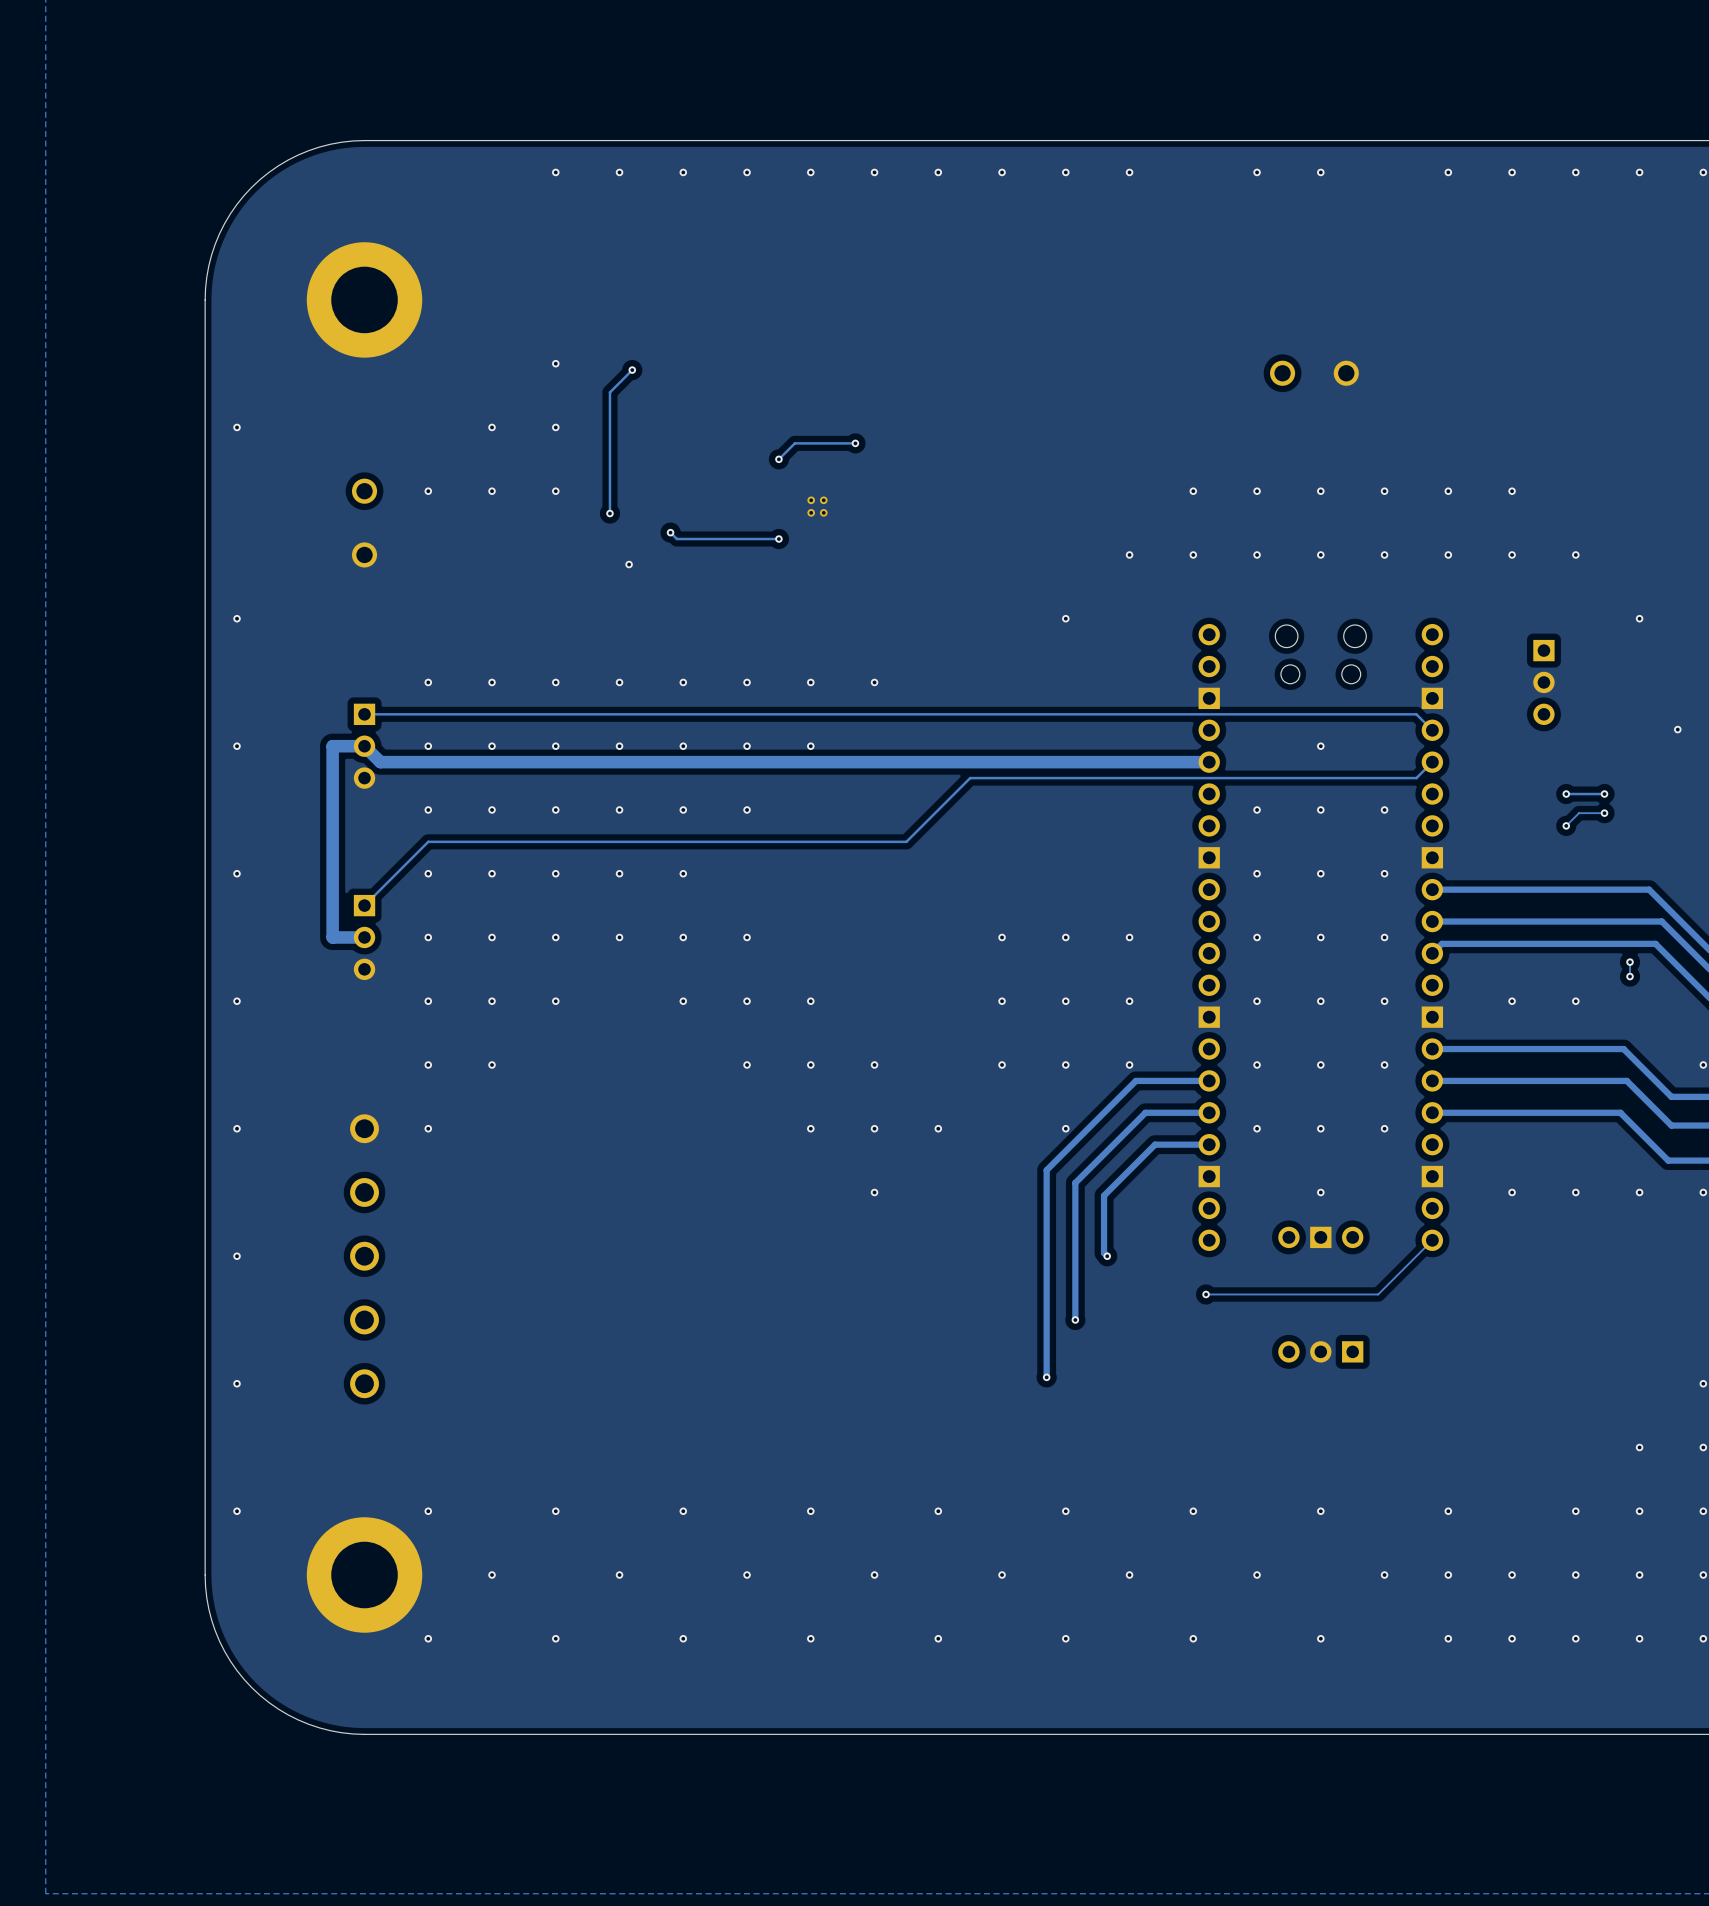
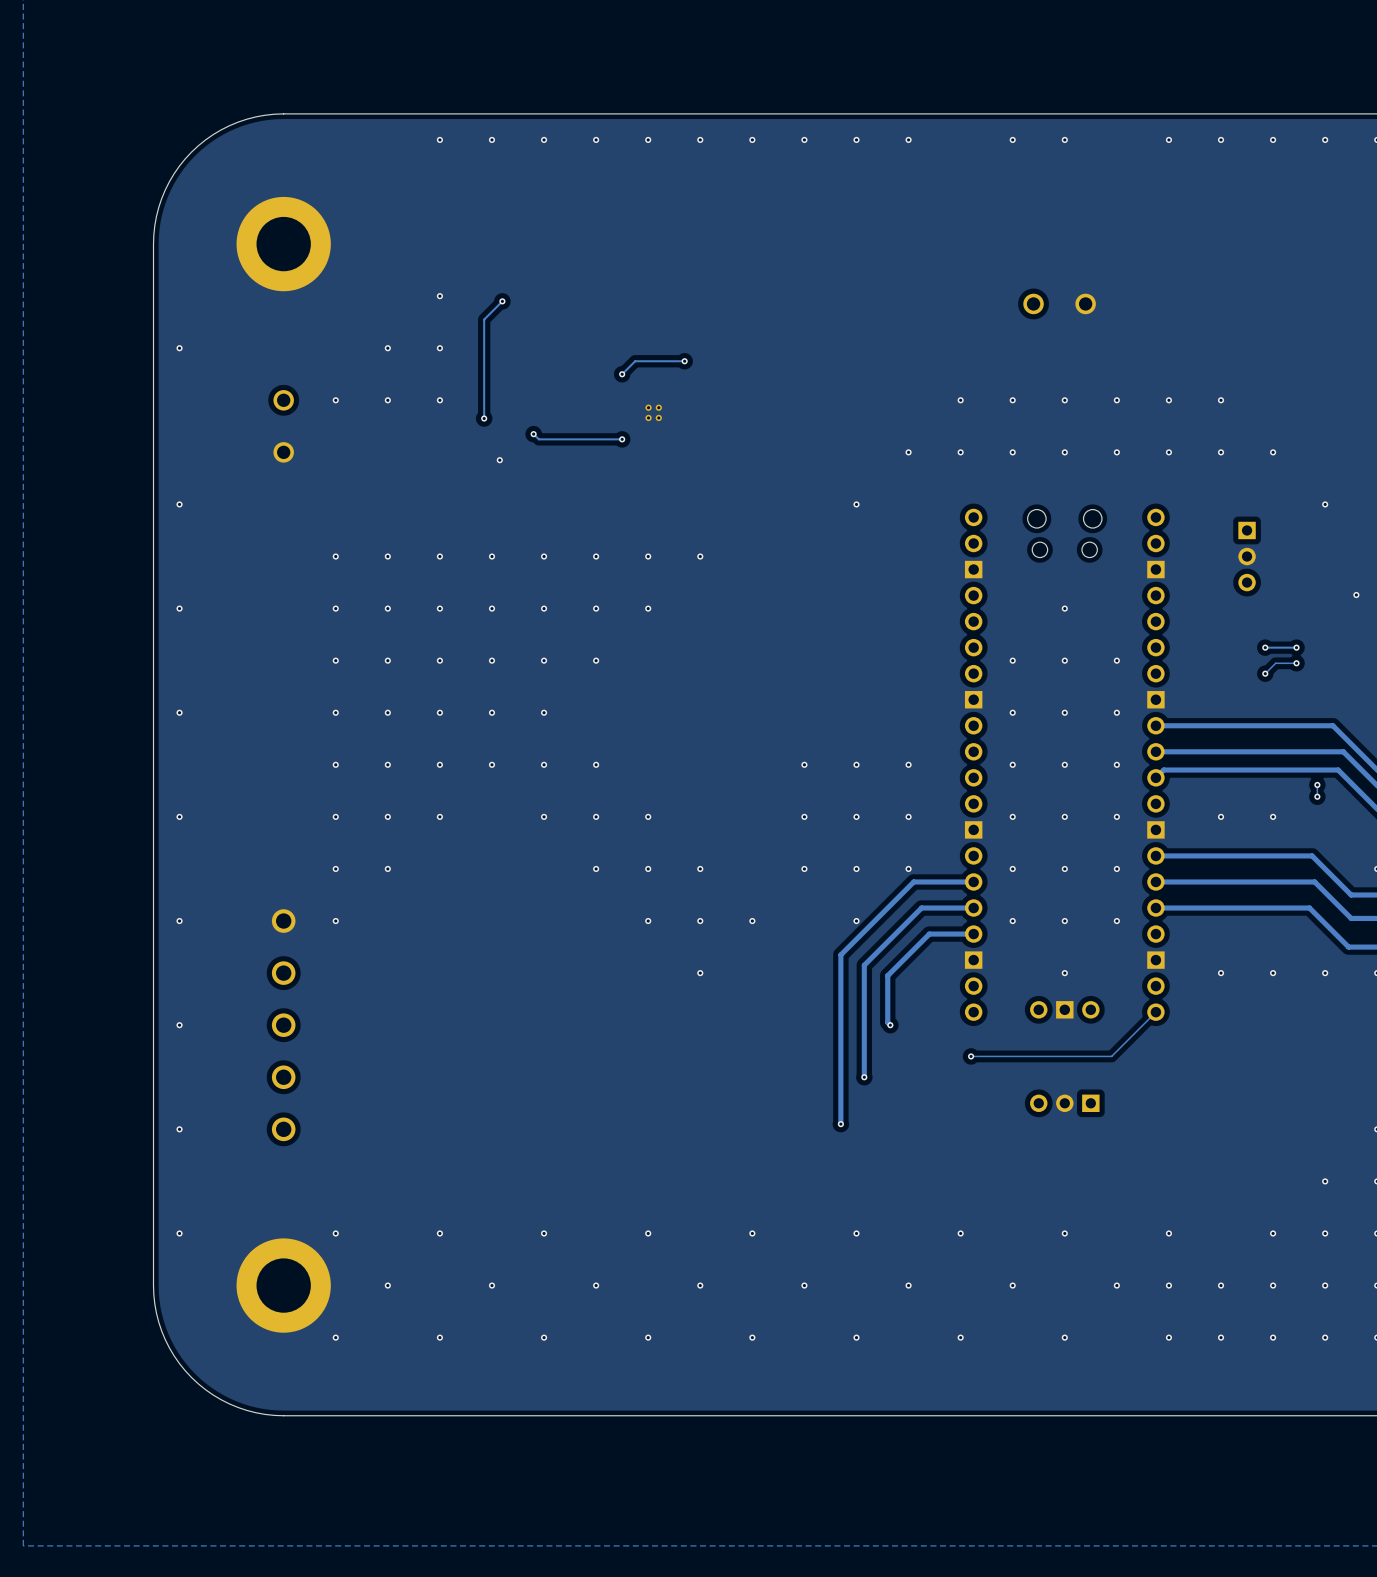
track: (364, 714) (1416, 714) (1432, 730) -> none
part: (364, 746) -> none
track: (1209, 762) (380, 762) (364, 746) (332, 746) (332, 937) (364, 937) -> none
track: (1432, 762) (1416, 778) (970, 778) (906, 841) (428, 841) (364, 905) -> none
part: (364, 937) -> none

